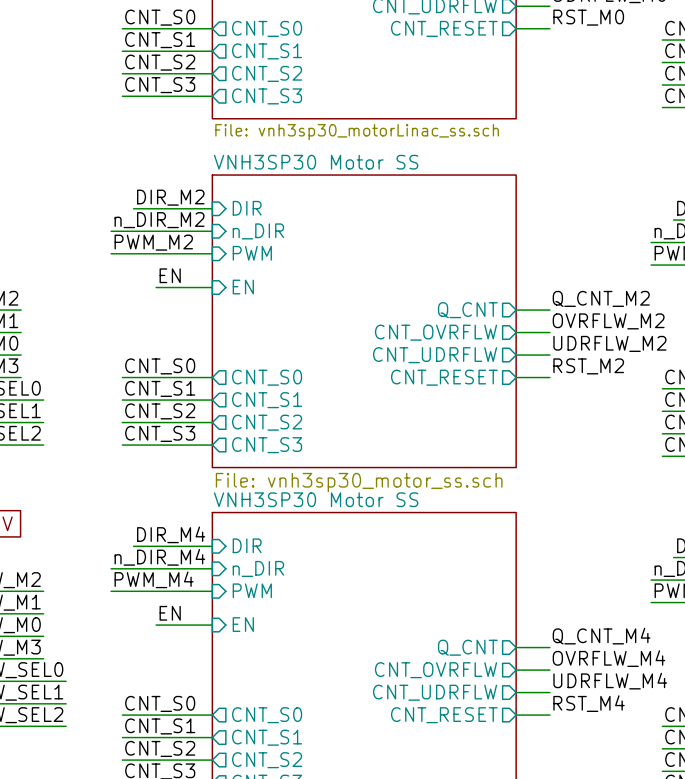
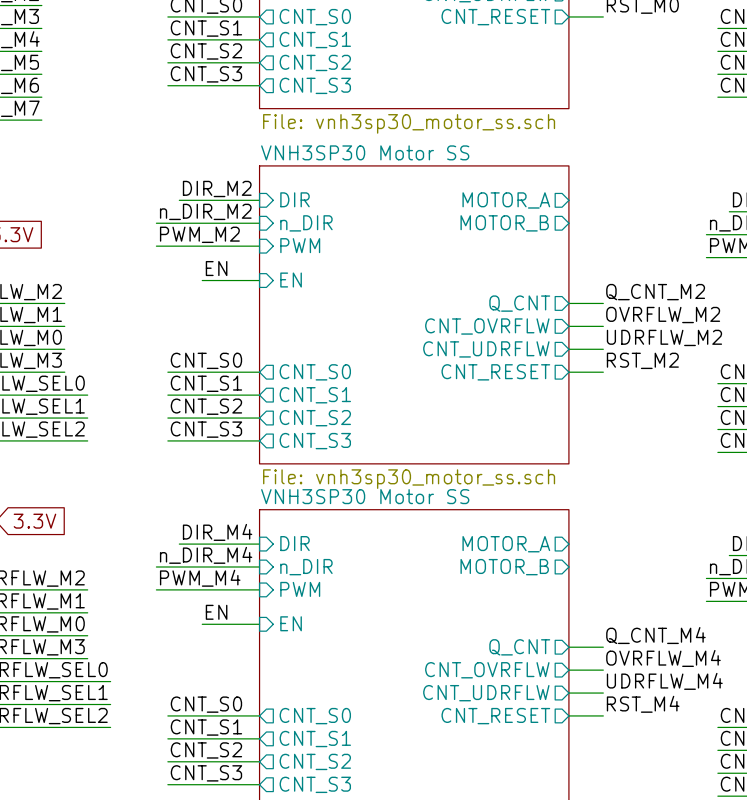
sheet value: File: vnh3sp30_motorLinac_ss.sch (357, 132) -> File: vnh3sp30_motor_ss.sch (409, 123)
sheet pin: none -> MOTOR_A (506, 200)
sheet pin: none -> MOTOR_B (504, 223)
sheet pin: none -> MOTOR_A (506, 544)
sheet pin: none -> MOTOR_B (504, 567)

